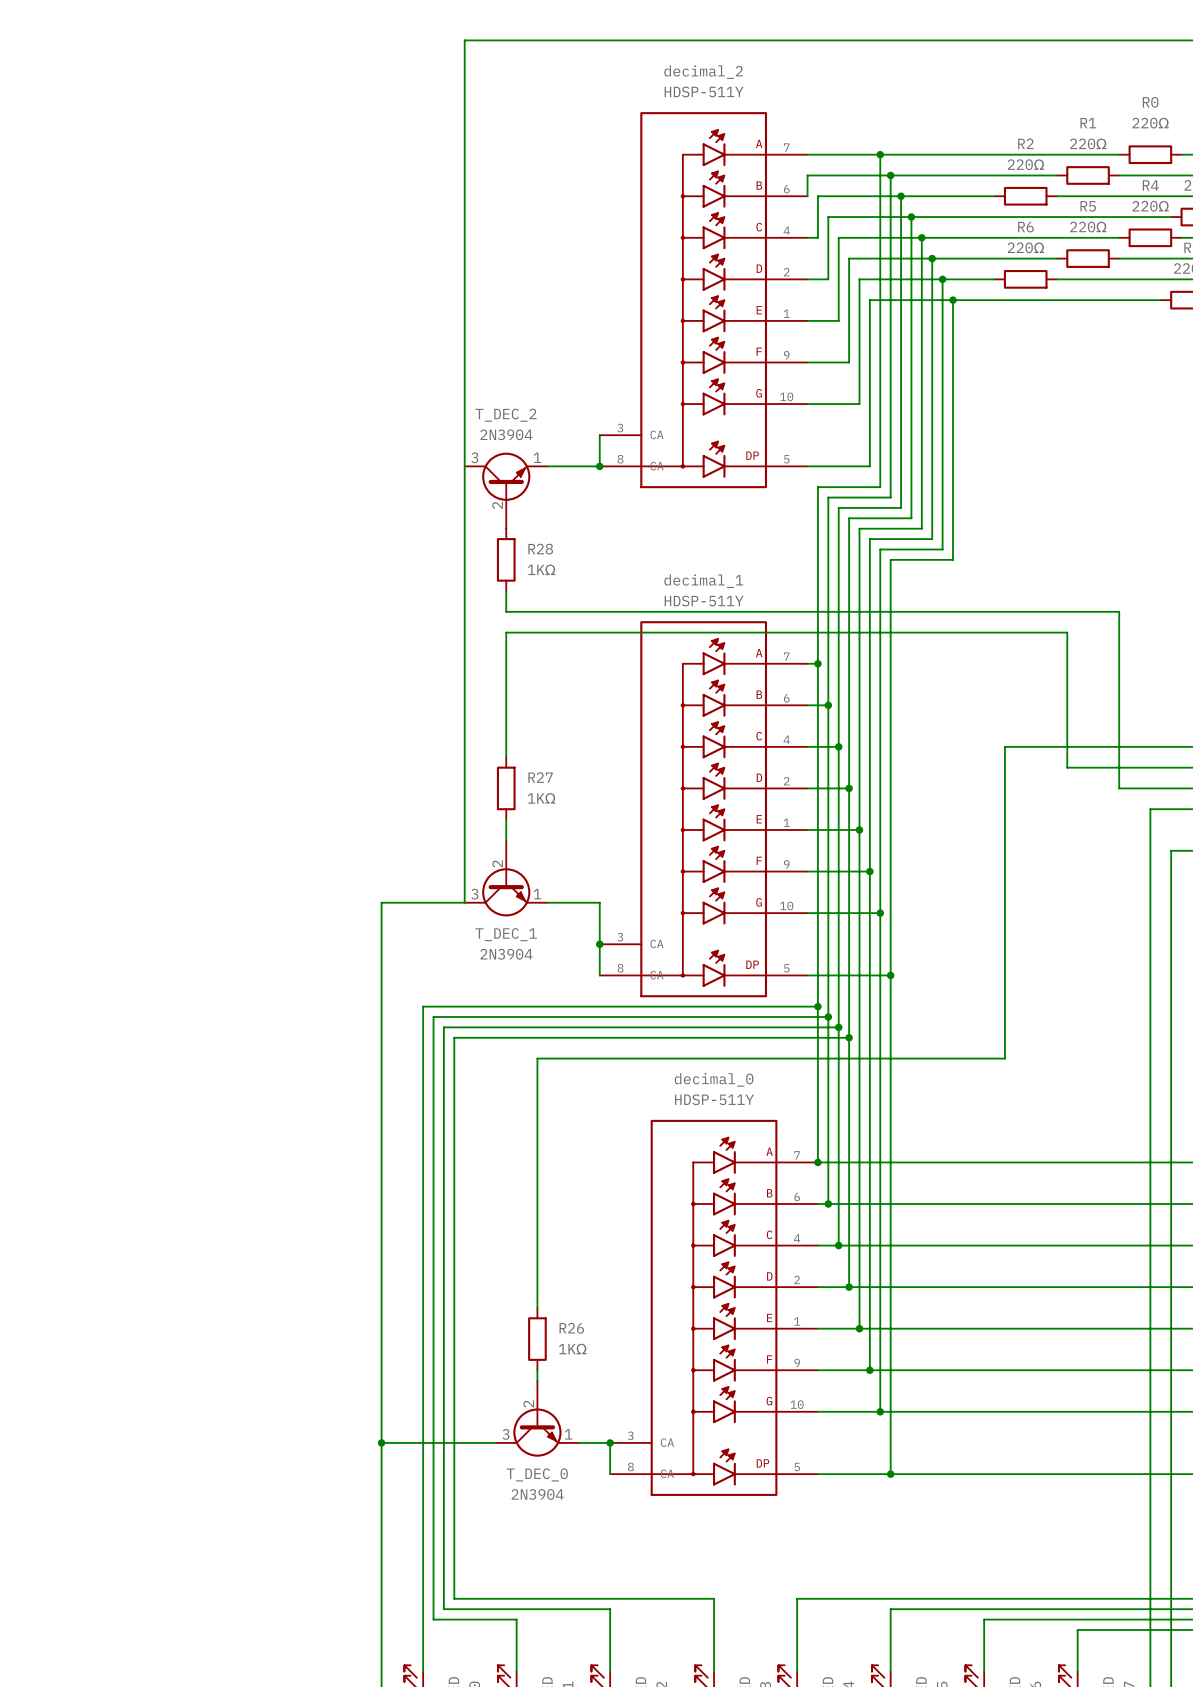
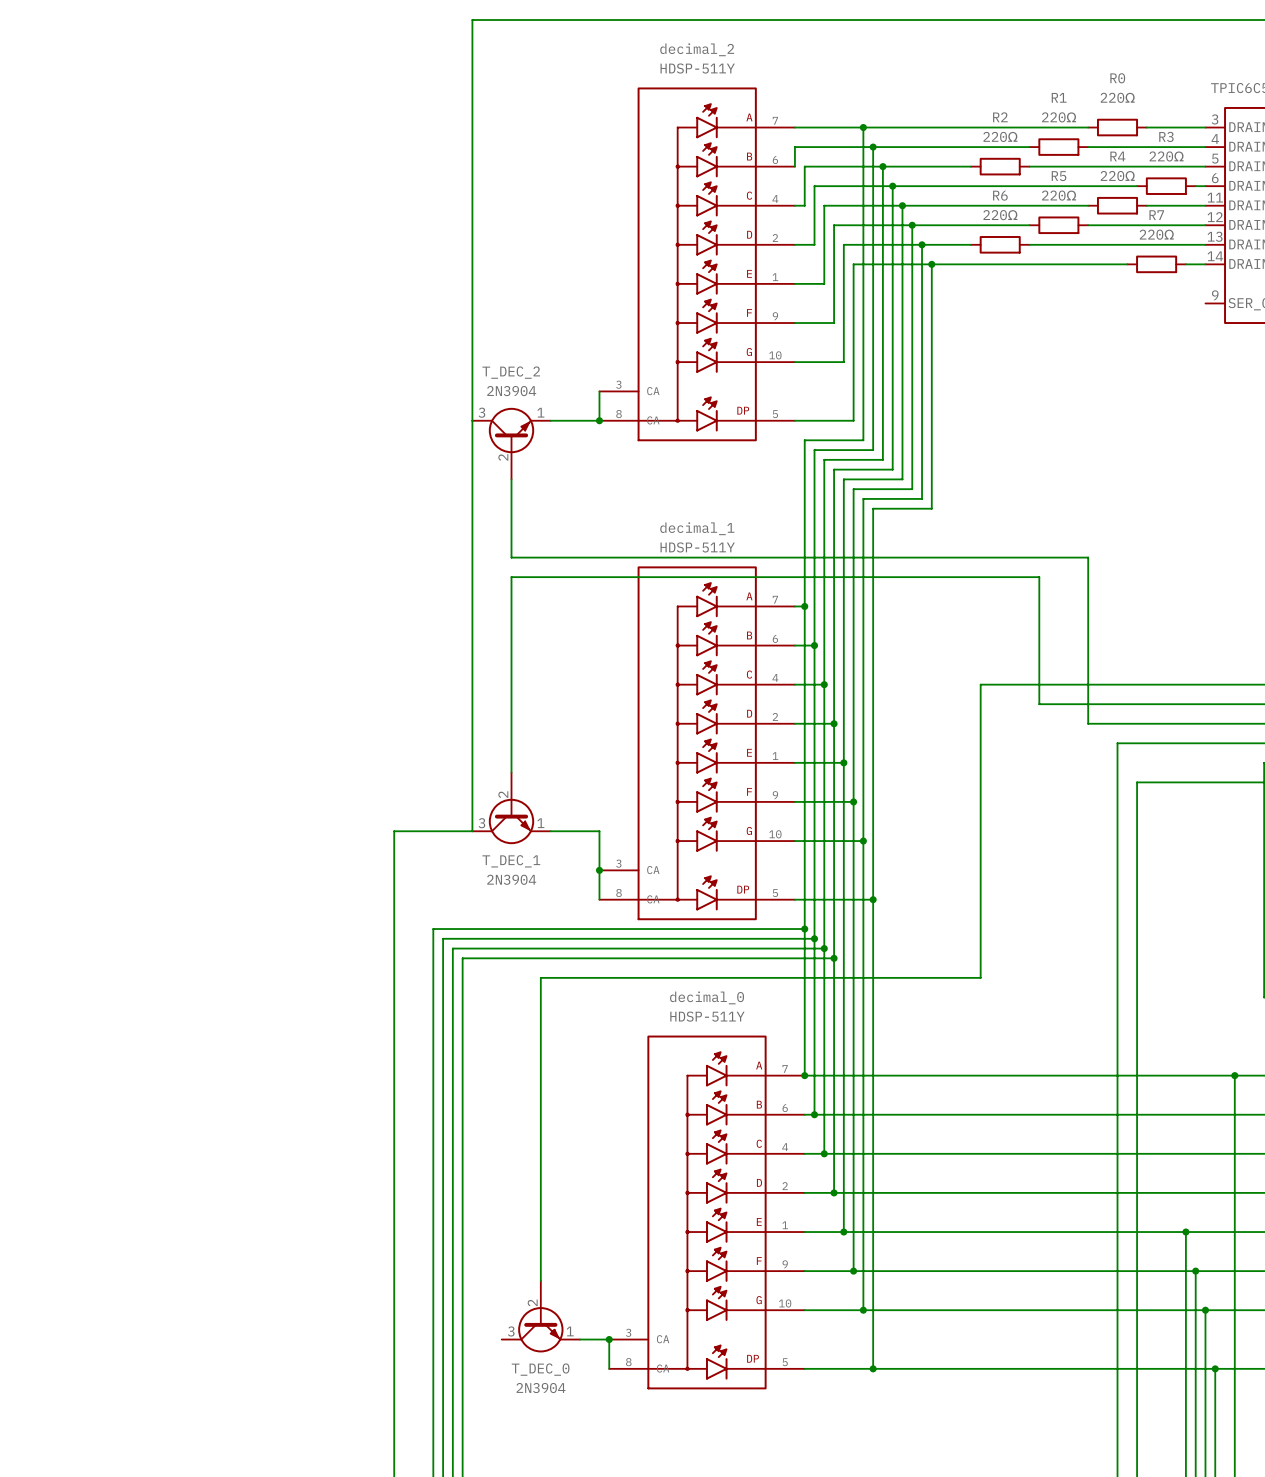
wire: none -> (511, 479) (511, 538)
R28: 1KΩ (506, 559) -> none
wire: none -> (511, 694) (511, 753)
R27: 1KΩ (506, 788) -> none
wire: none -> (540, 1212) (540, 1271)
R26: 1KΩ (537, 1339) -> none
wire: (381, 1442) (495, 1442) -> none
junction: (381, 1442) -> none

